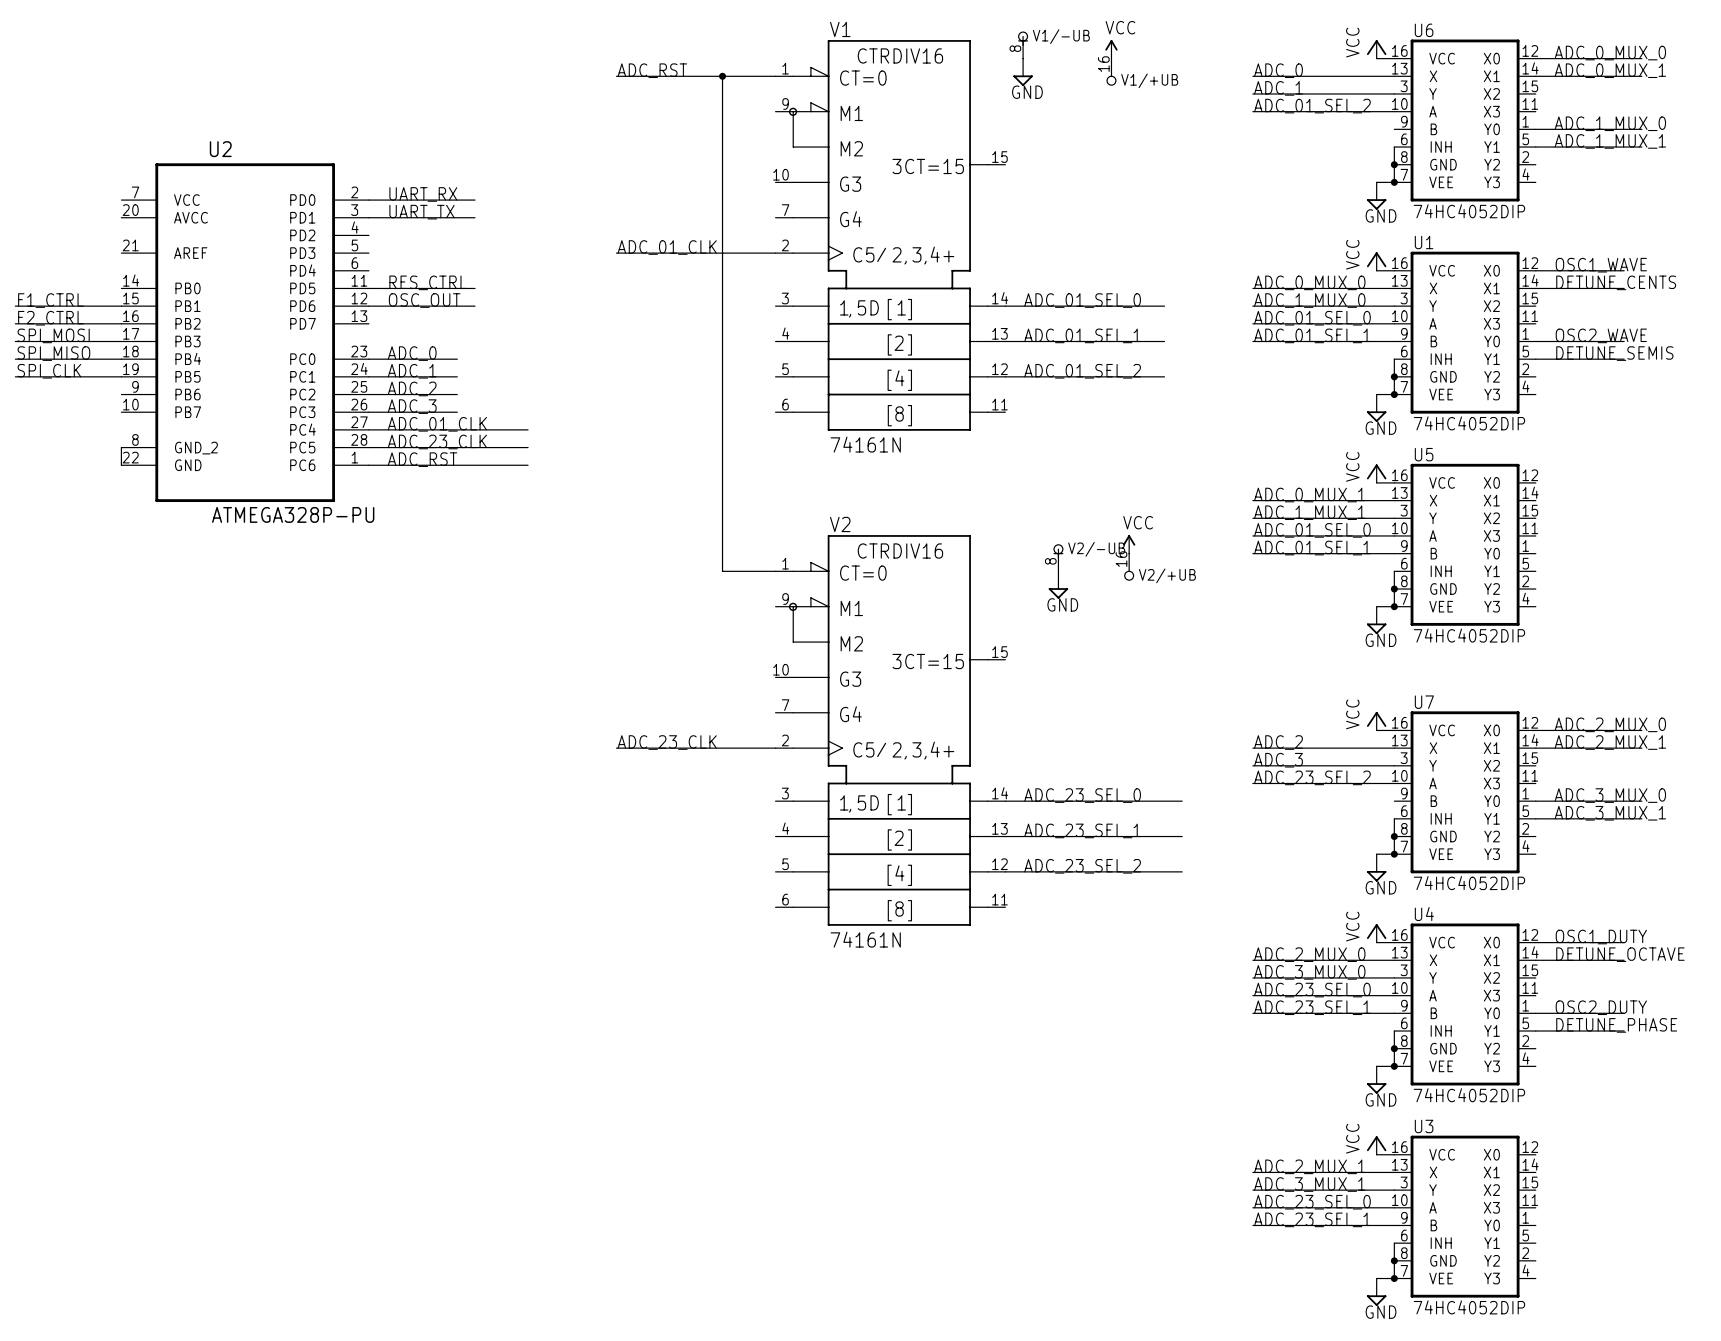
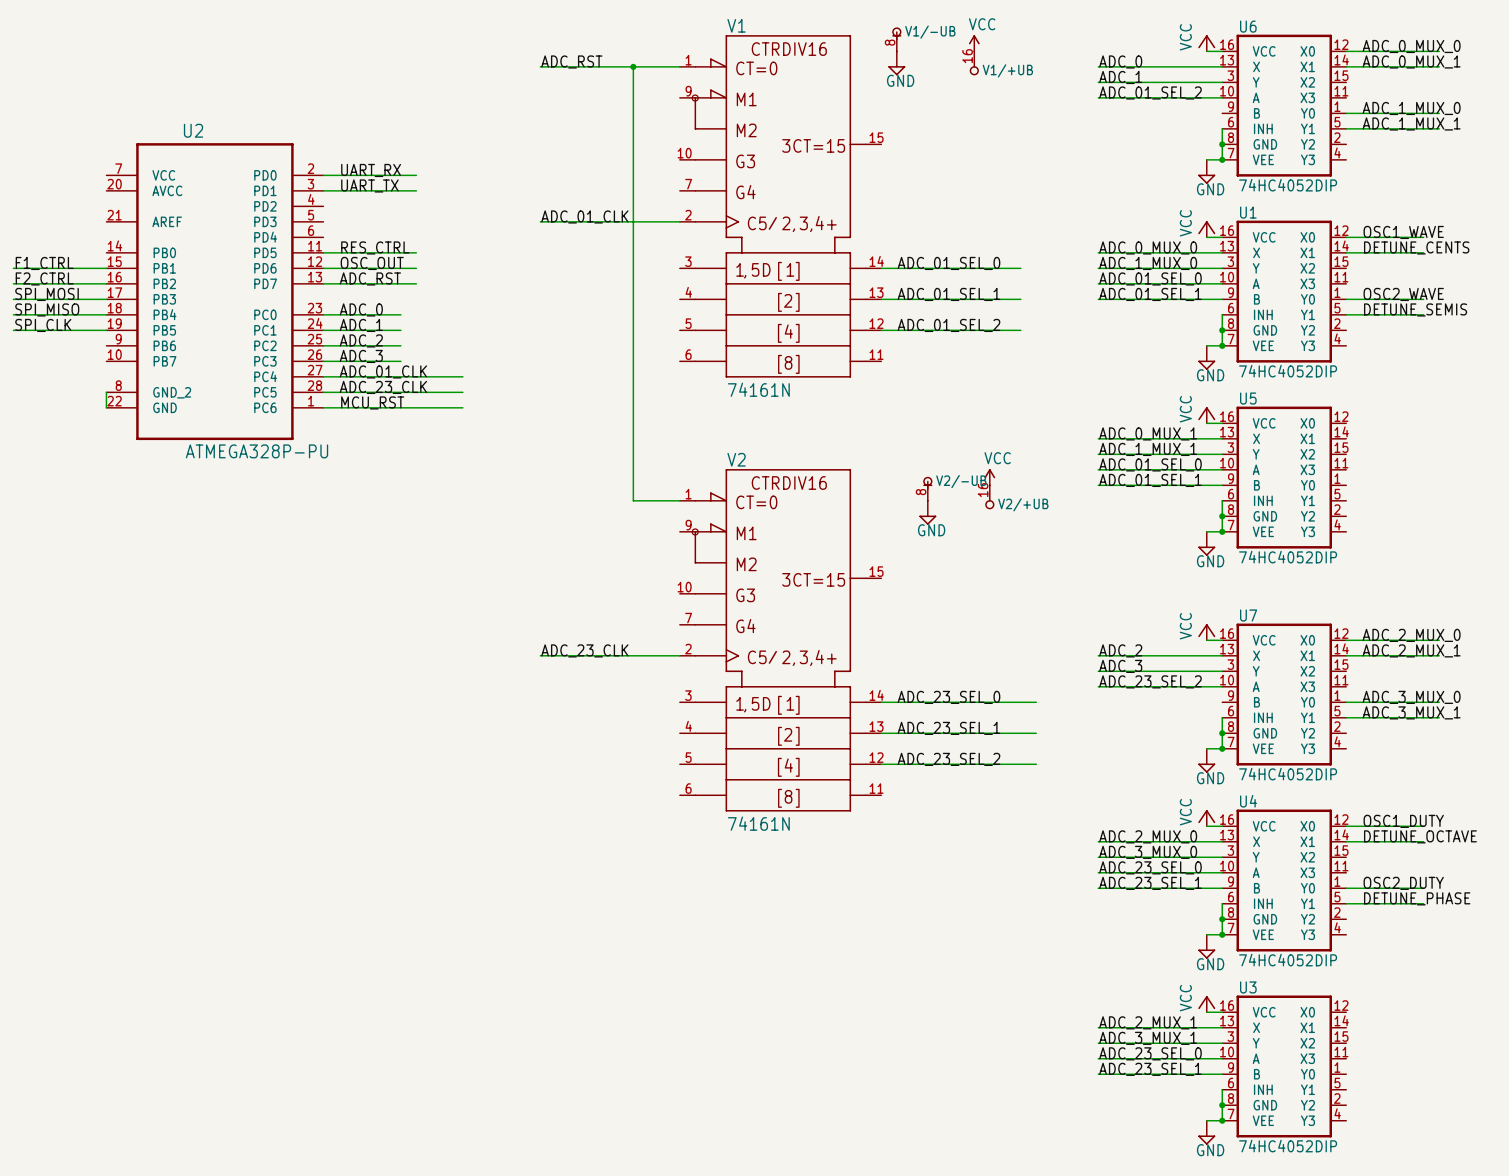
label: none -> ADC_RST (370, 278)
wire: none -> (323, 283) (416, 283)
label: ADC_RST (422, 459) -> MCU_RST (372, 402)

